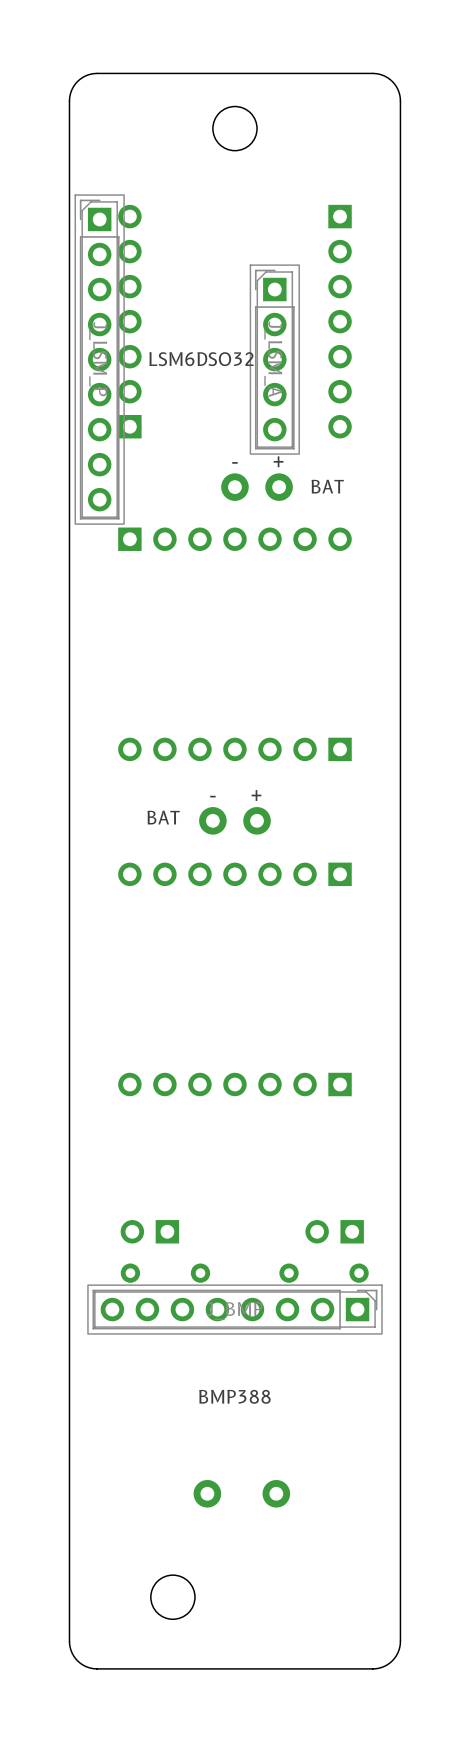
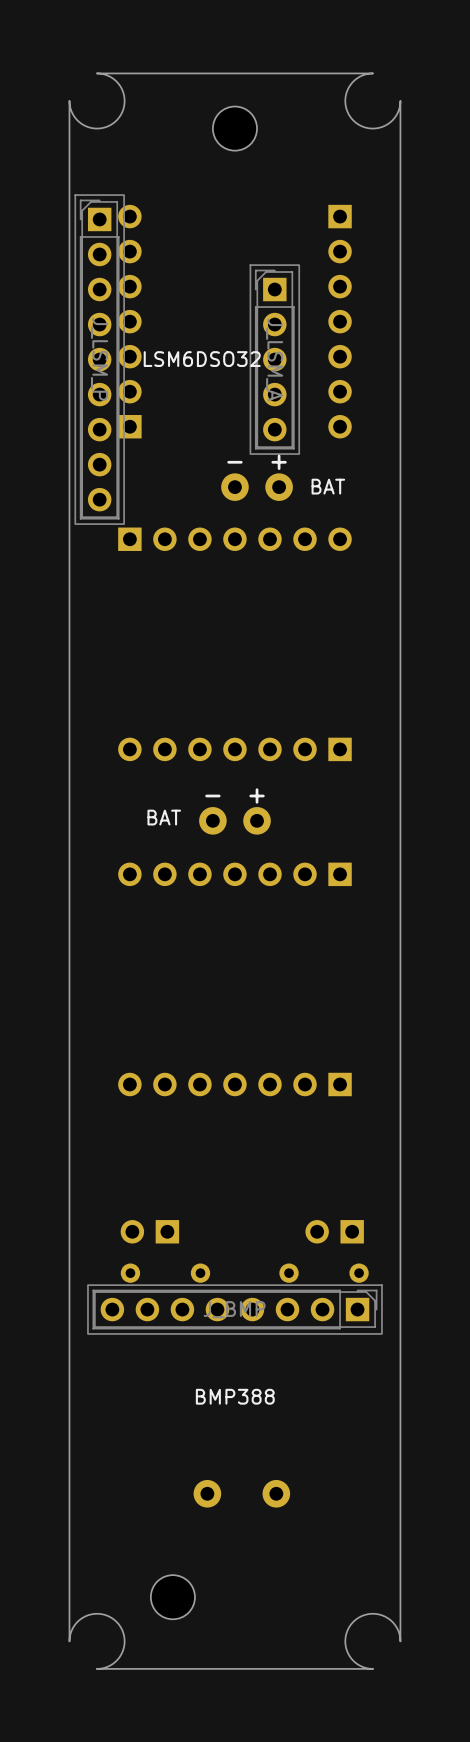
board edge: (97, 73) (85, 76) (77, 81) (71, 91) (69, 101) -> (97, 73) (113, 78) (123, 92) (124, 105) (116, 120) (101, 128) (84, 125) (72, 114) (69, 101)
board edge: (372, 73) (384, 76) (392, 81) (398, 91) (400, 101) -> (372, 73) (356, 78) (346, 92) (346, 108) (353, 120) (368, 128) (381, 127) (395, 117) (400, 101)
board edge: (69, 1641) (72, 1653) (77, 1660) (87, 1667) (97, 1668) -> (69, 1641) (72, 1628) (84, 1616) (101, 1614) (116, 1621) (124, 1636) (121, 1653) (113, 1663) (97, 1668)
board edge: (400, 1641) (398, 1650) (392, 1660) (384, 1666) (372, 1668) -> (400, 1641) (395, 1625) (381, 1615) (364, 1614) (353, 1621) (346, 1633) (346, 1650) (356, 1663) (372, 1668)

